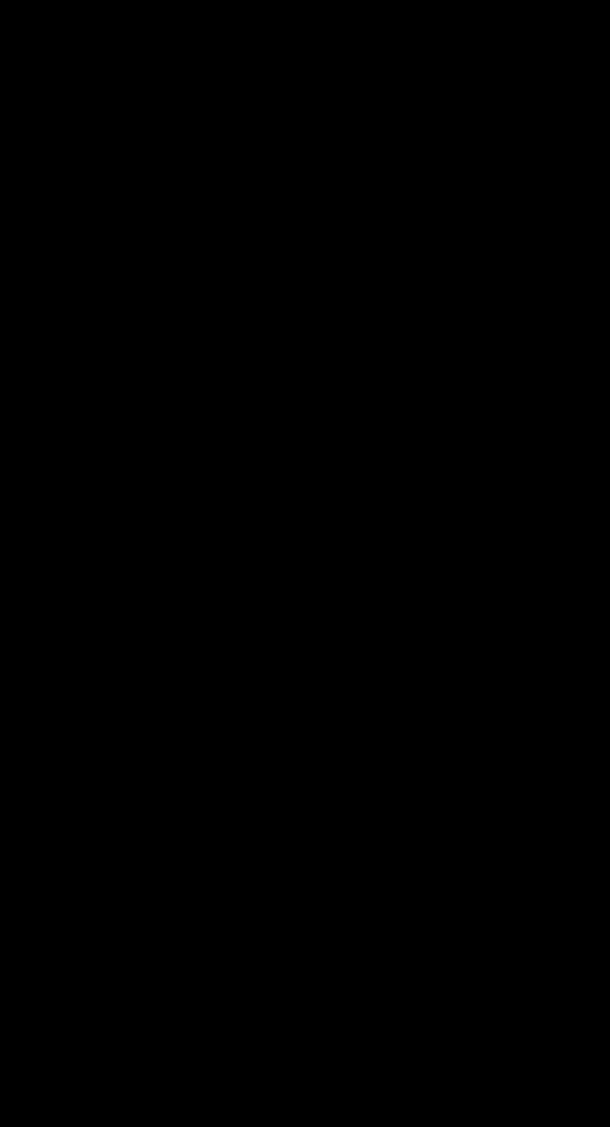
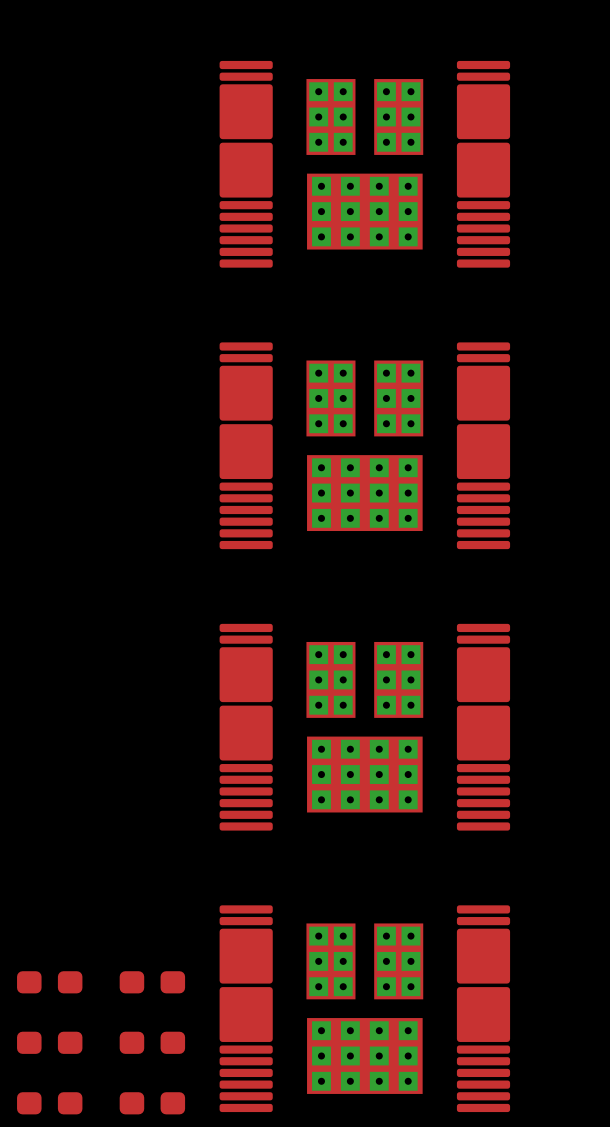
part: none -> (364, 164)
part: none -> (364, 445)
part: none -> (364, 727)
part: none -> (49, 982)
part: none -> (152, 982)
part: none -> (364, 1008)
part: none -> (49, 1042)
part: none -> (152, 1042)
part: none -> (49, 1103)
part: none -> (152, 1103)

